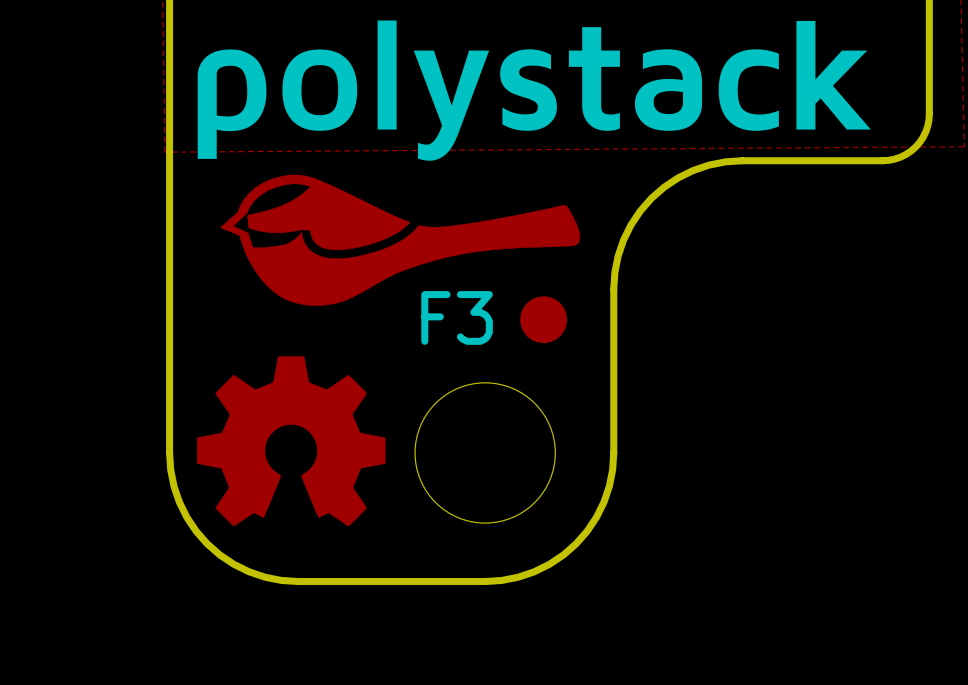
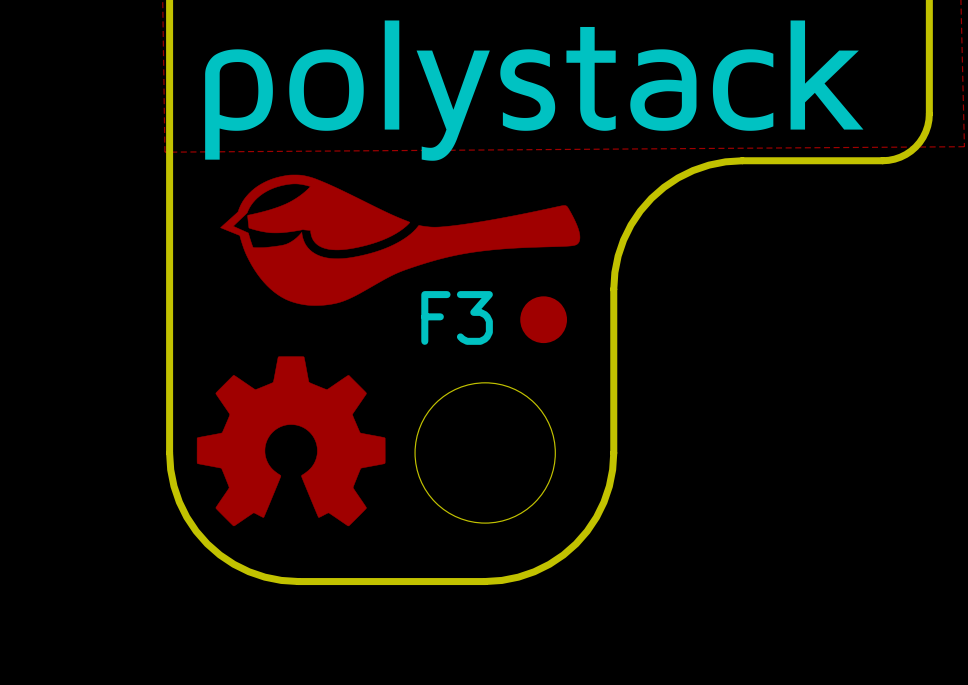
drawing shape: [197, 20, 871, 161] -> [205, 20, 864, 161]

